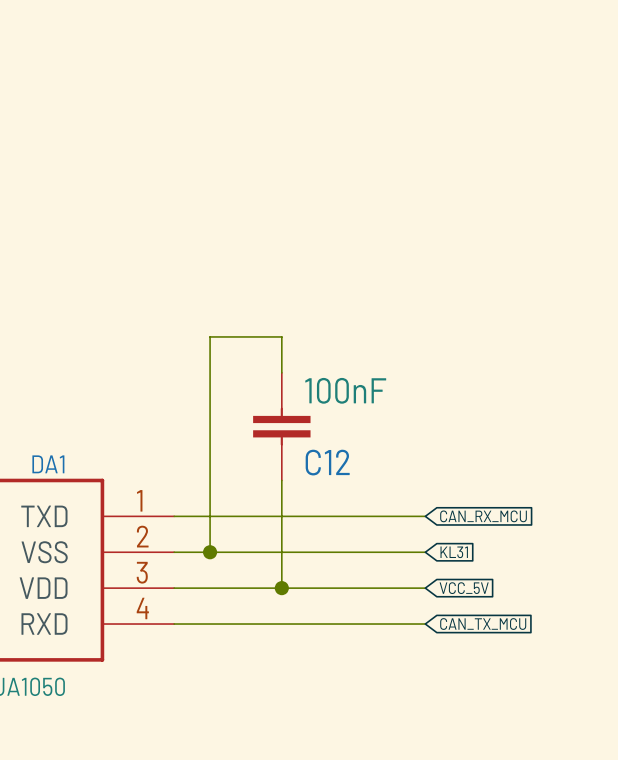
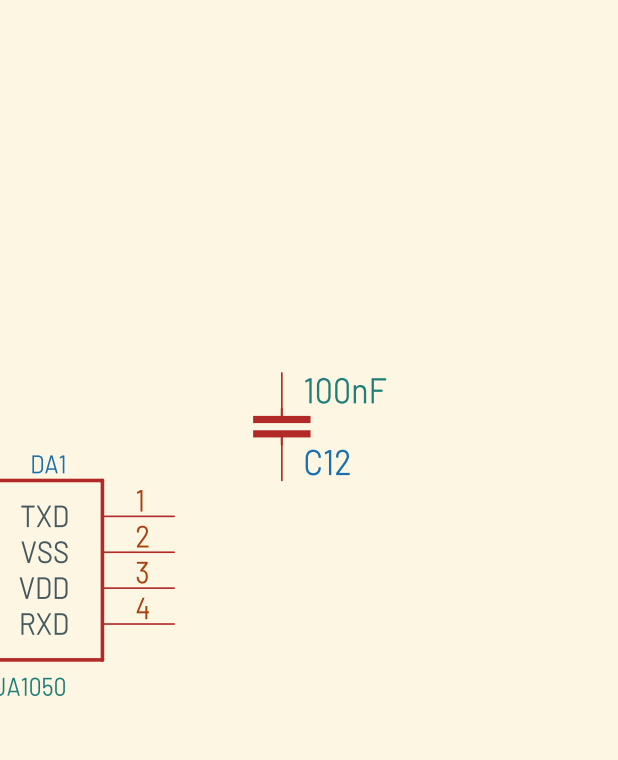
wire: (281, 372) (281, 336) (210, 336) (210, 552) -> none
wire: (281, 480) (281, 588) -> none
wire: (174, 516) (425, 516) -> none
global label: CAN_RX_MCU (483, 516) -> none
wire: (174, 552) (425, 552) -> none
junction: (210, 552) -> none
global label: KL31 (454, 552) -> none
wire: (174, 588) (425, 588) -> none
junction: (281, 588) -> none
global label: VCC_5V (464, 588) -> none
wire: (174, 624) (425, 624) -> none
global label: CAN_TX_MCU (483, 624) -> none

